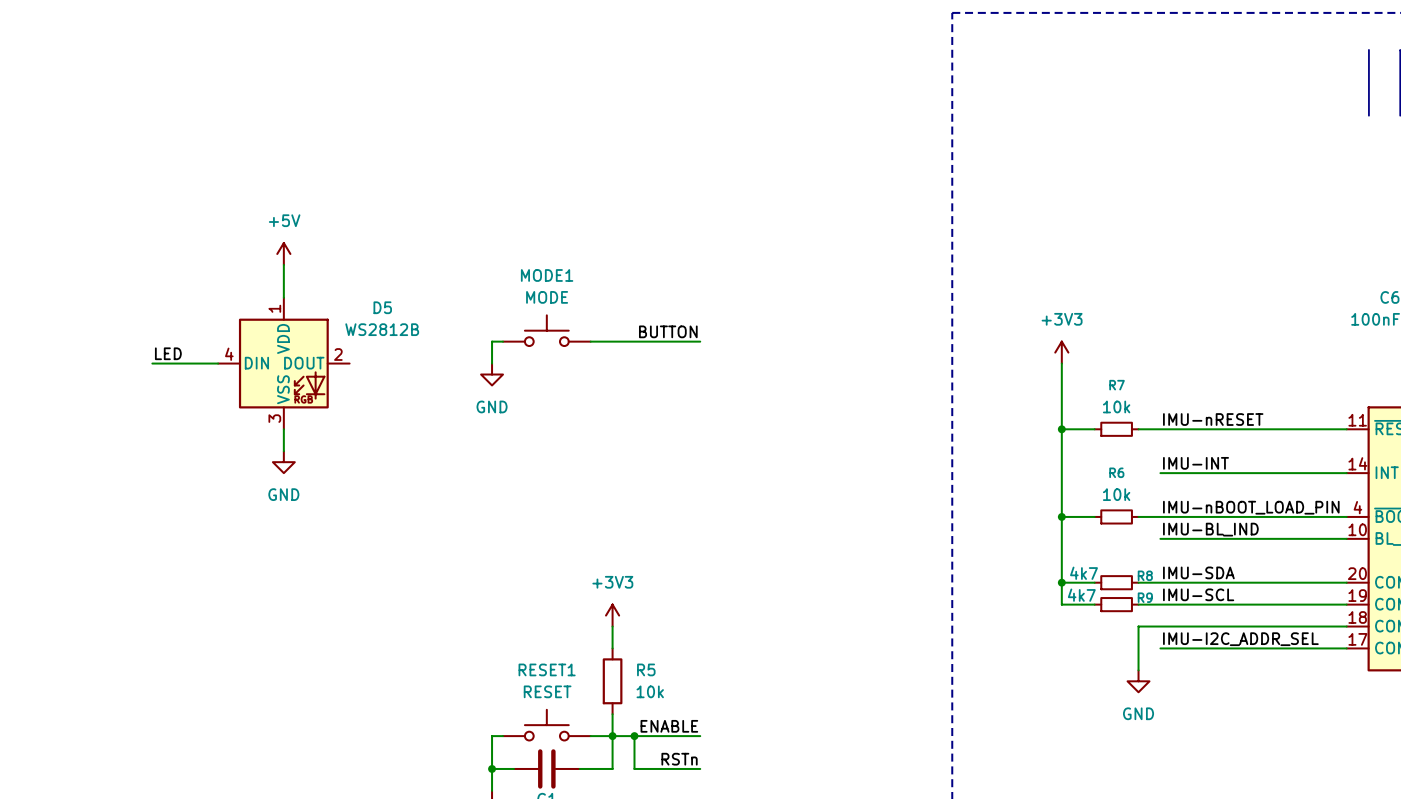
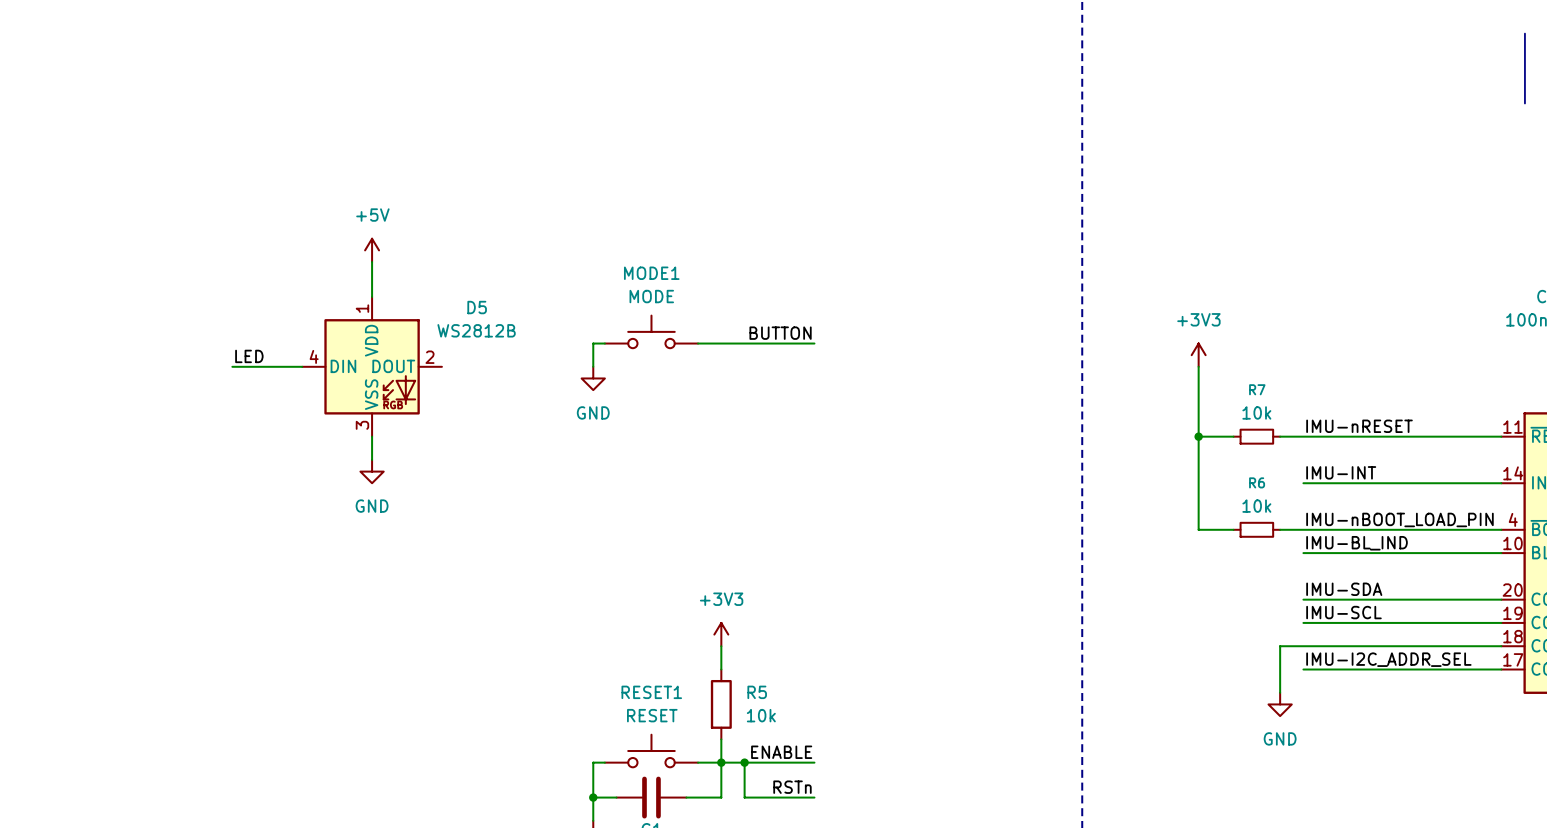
wire: (1061, 516) (1061, 604) (1094, 604) -> none
junction: (1061, 516) -> none
wire: (1061, 582) (1094, 582) -> none
junction: (1061, 582) -> none
R8: 4k7 (1116, 582) -> none
wire: (1138, 582) (1160, 582) -> none
R9: 4k7 (1116, 604) -> none
wire: (1138, 604) (1160, 604) -> none

